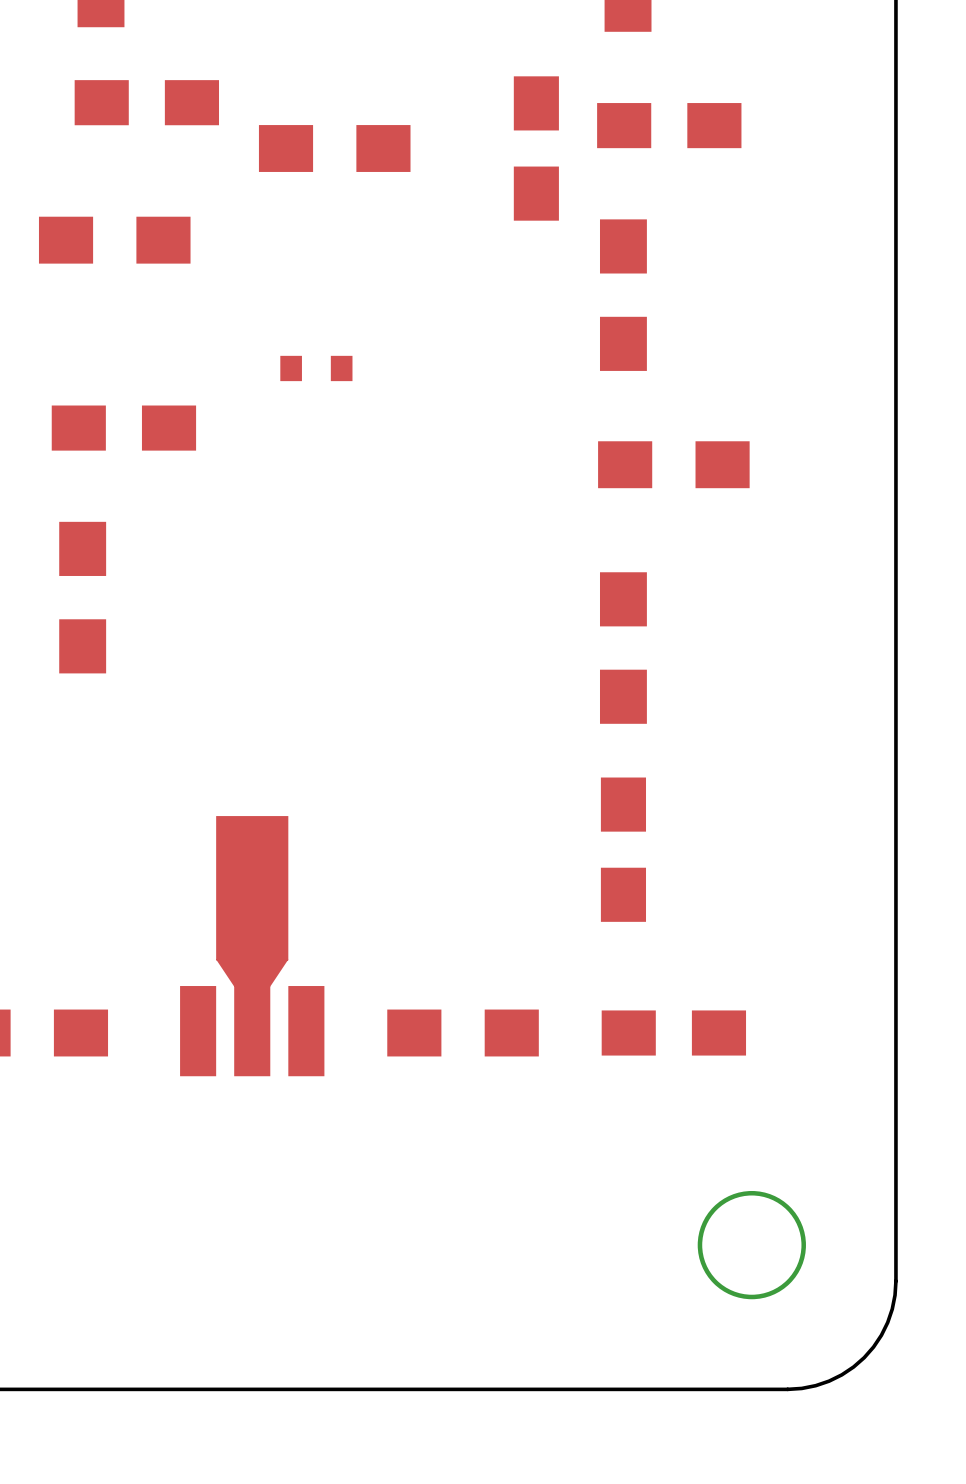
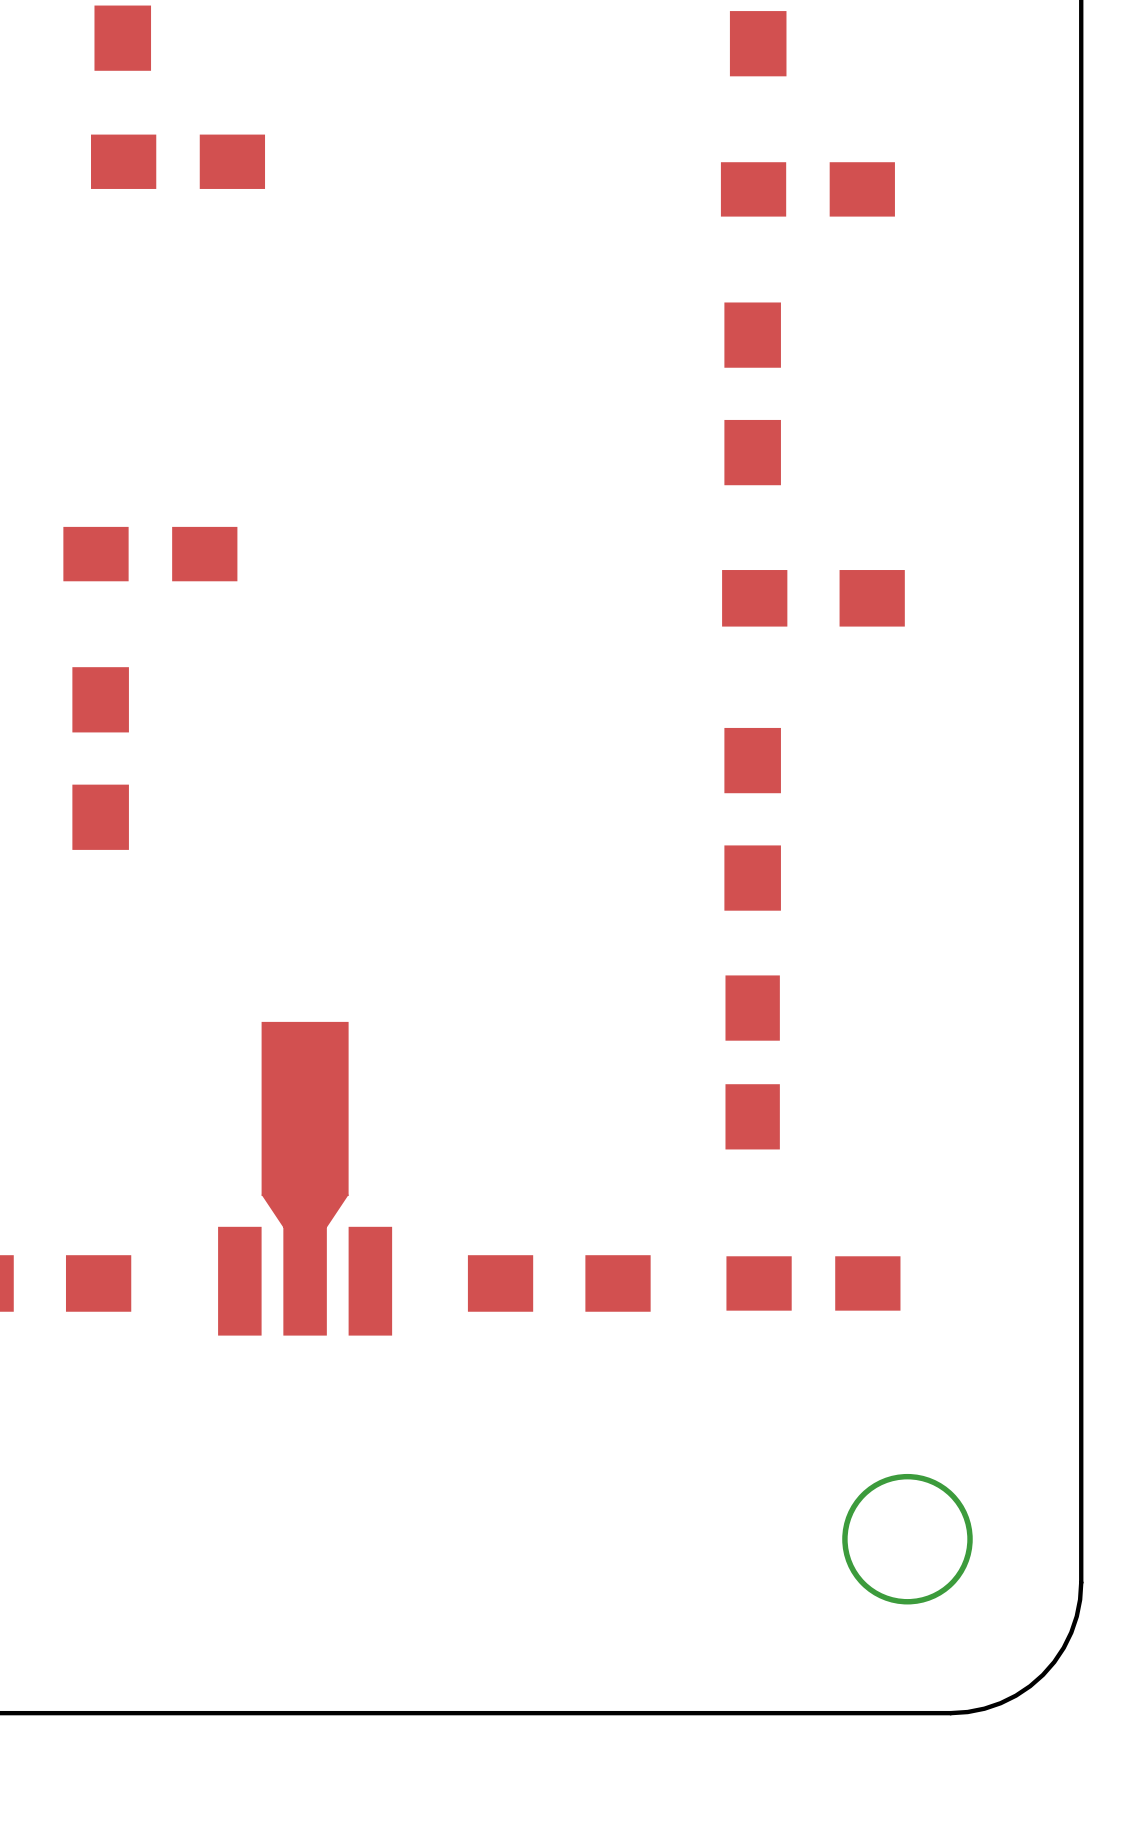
part: (334, 148) -> none
part: (536, 148) -> none
part: (114, 240) -> none
part: (316, 368) -> none

